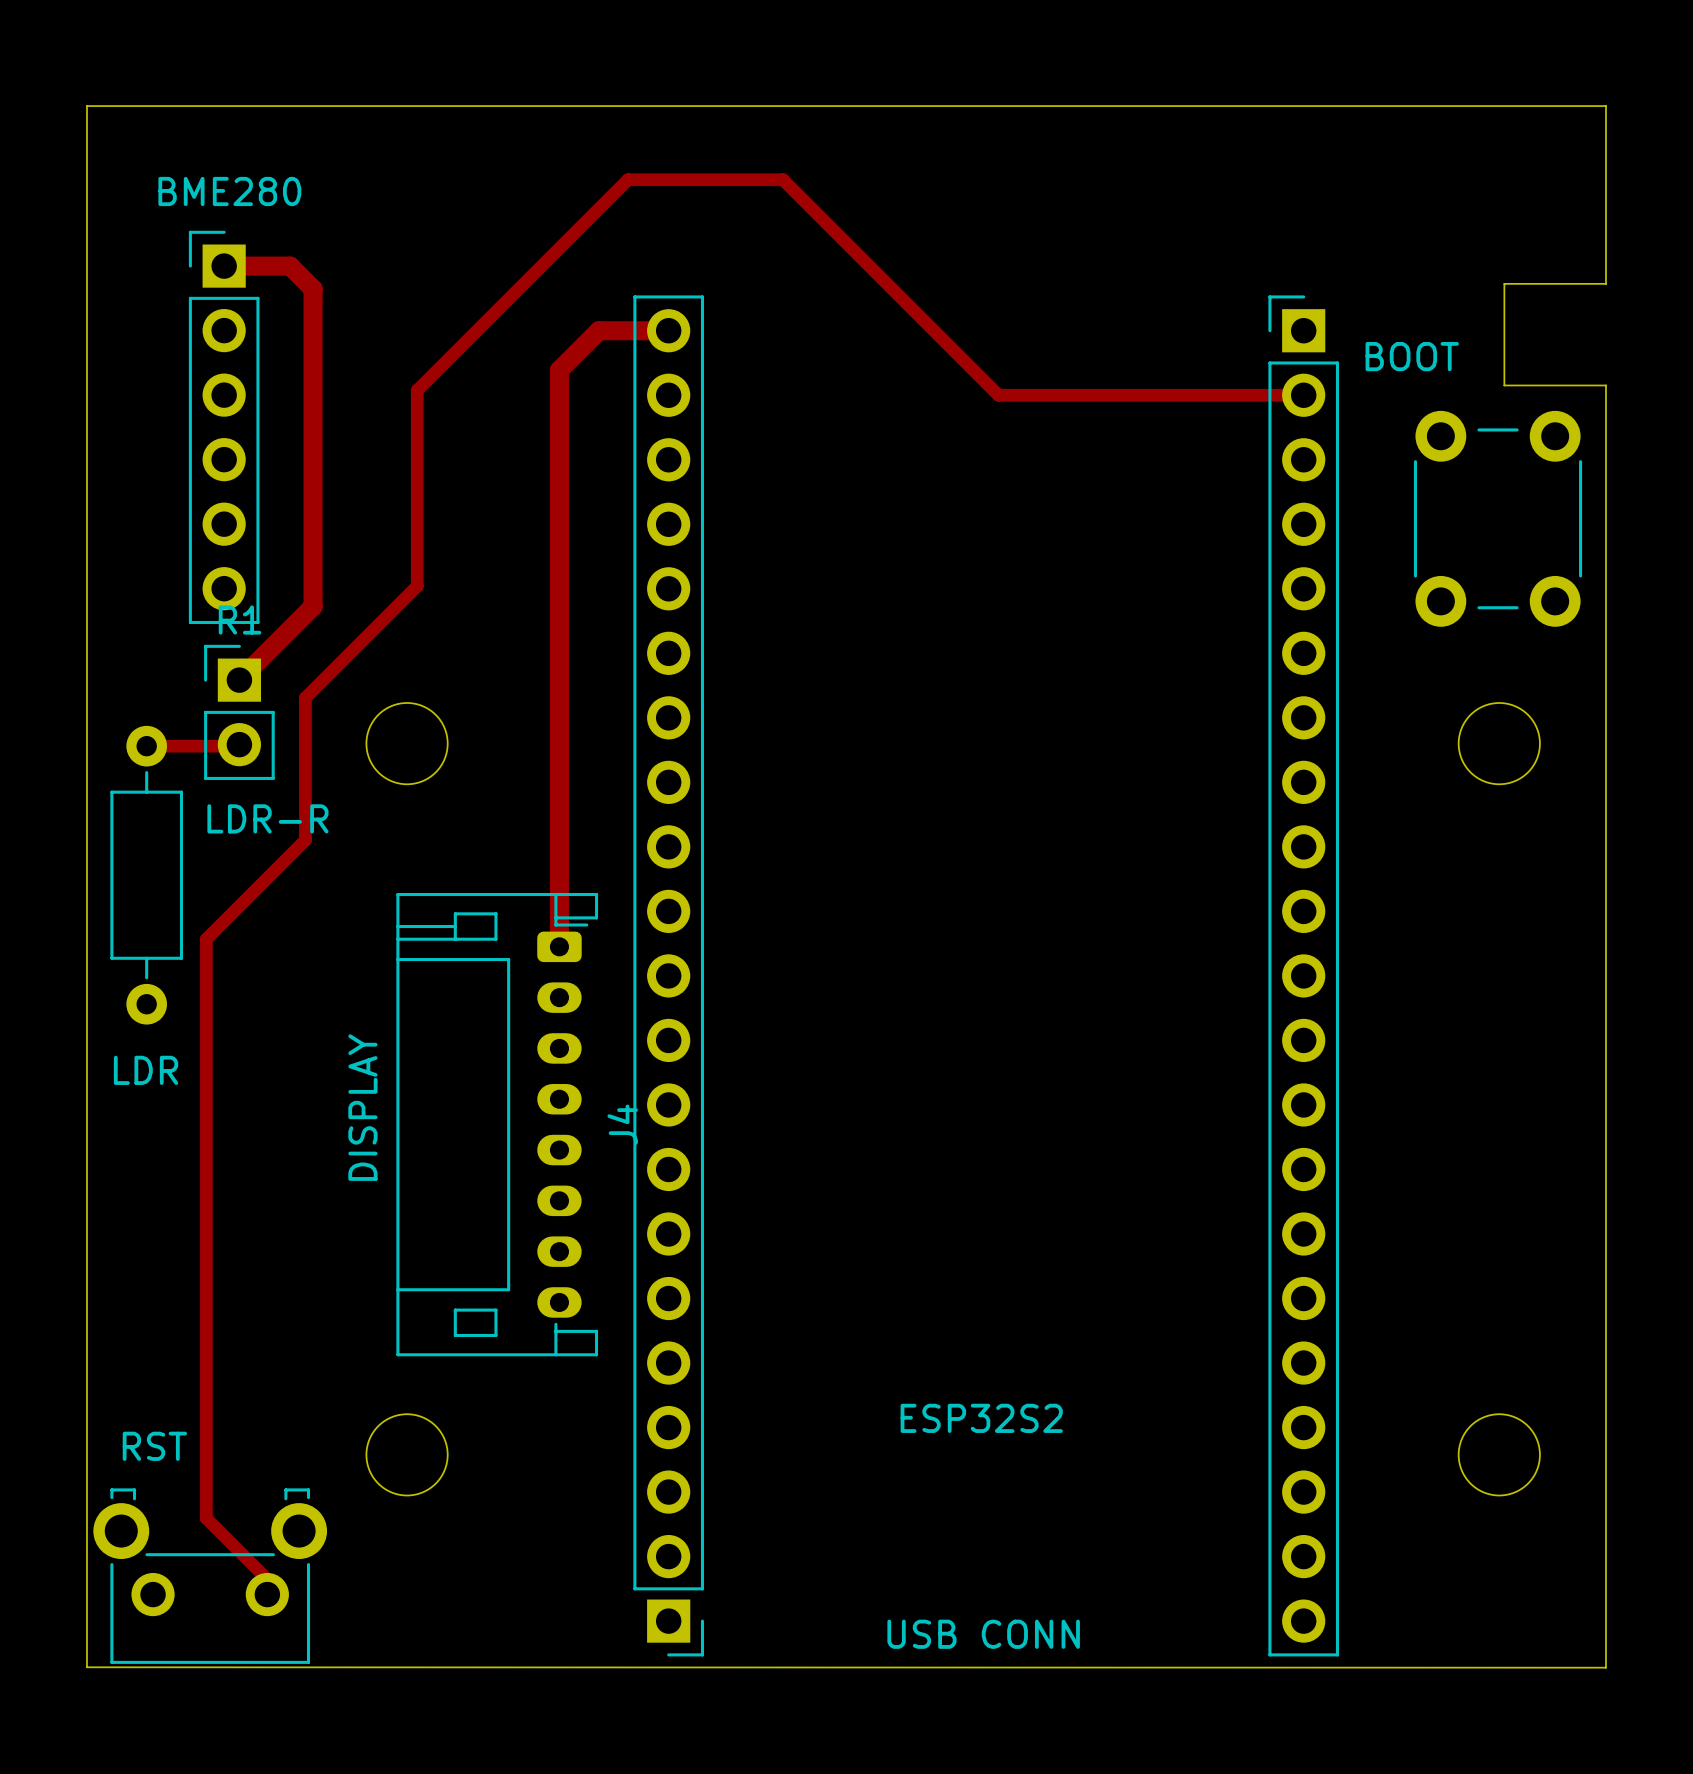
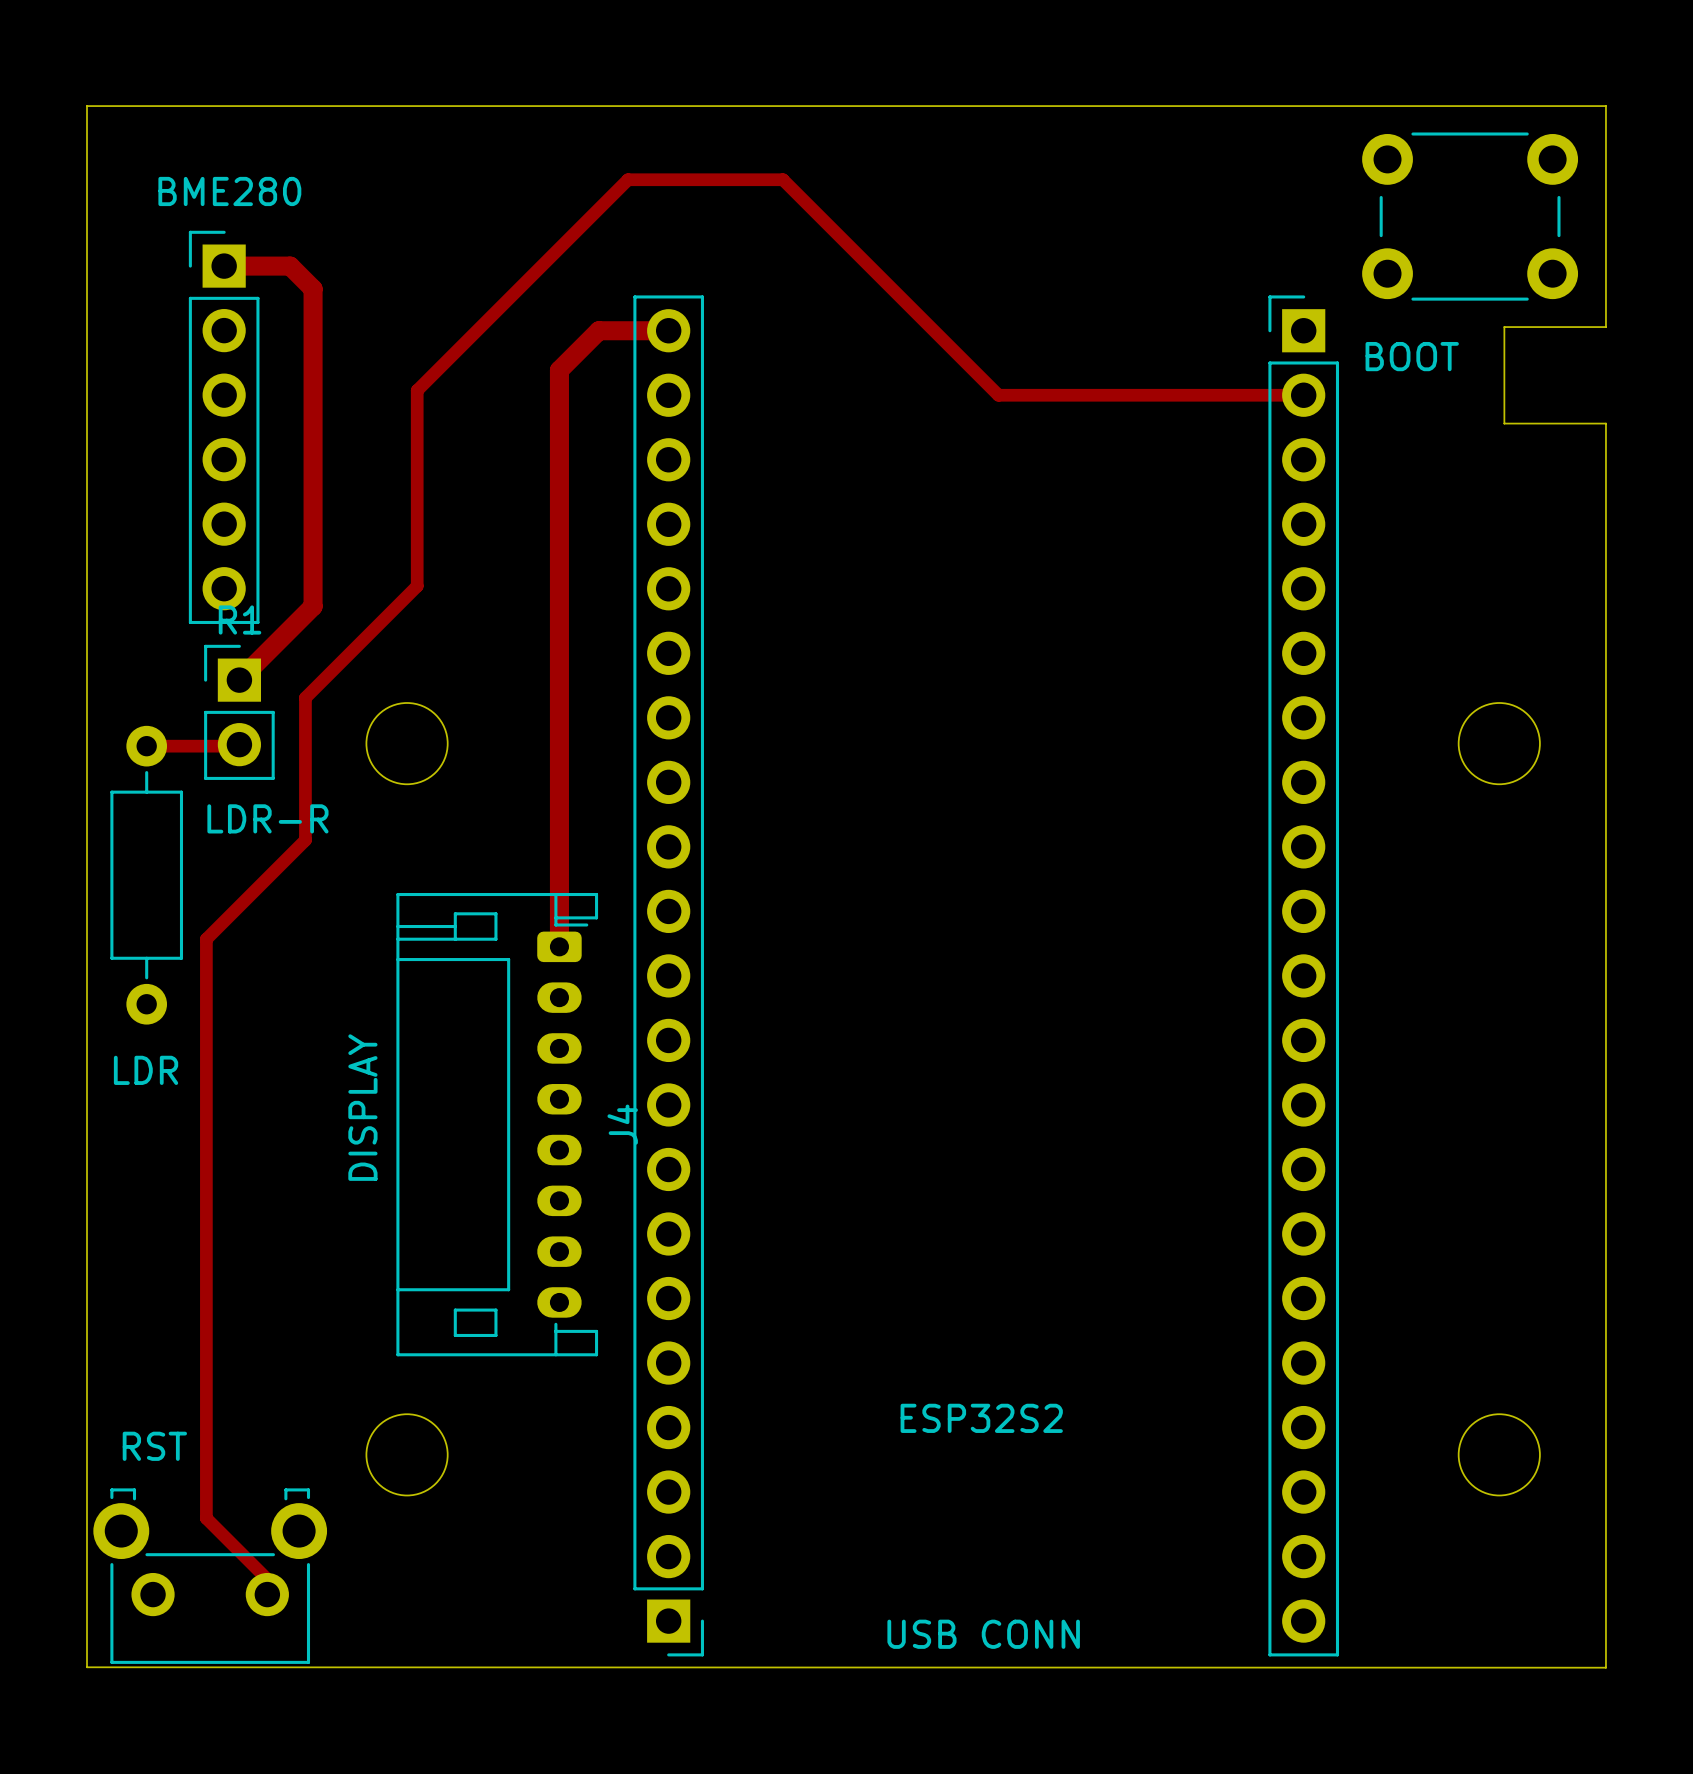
board edge: (1605, 283) (1504, 283) (1504, 327) -> (1605, 283) (1605, 327) (1504, 327)
board edge: (1504, 385) (1605, 385) (1605, 423) -> (1504, 385) (1504, 423) (1605, 423)
part rotation: 0° (1498, 518) -> 90° clockwise (1470, 216)
part position: (1498, 518) -> (1470, 216)

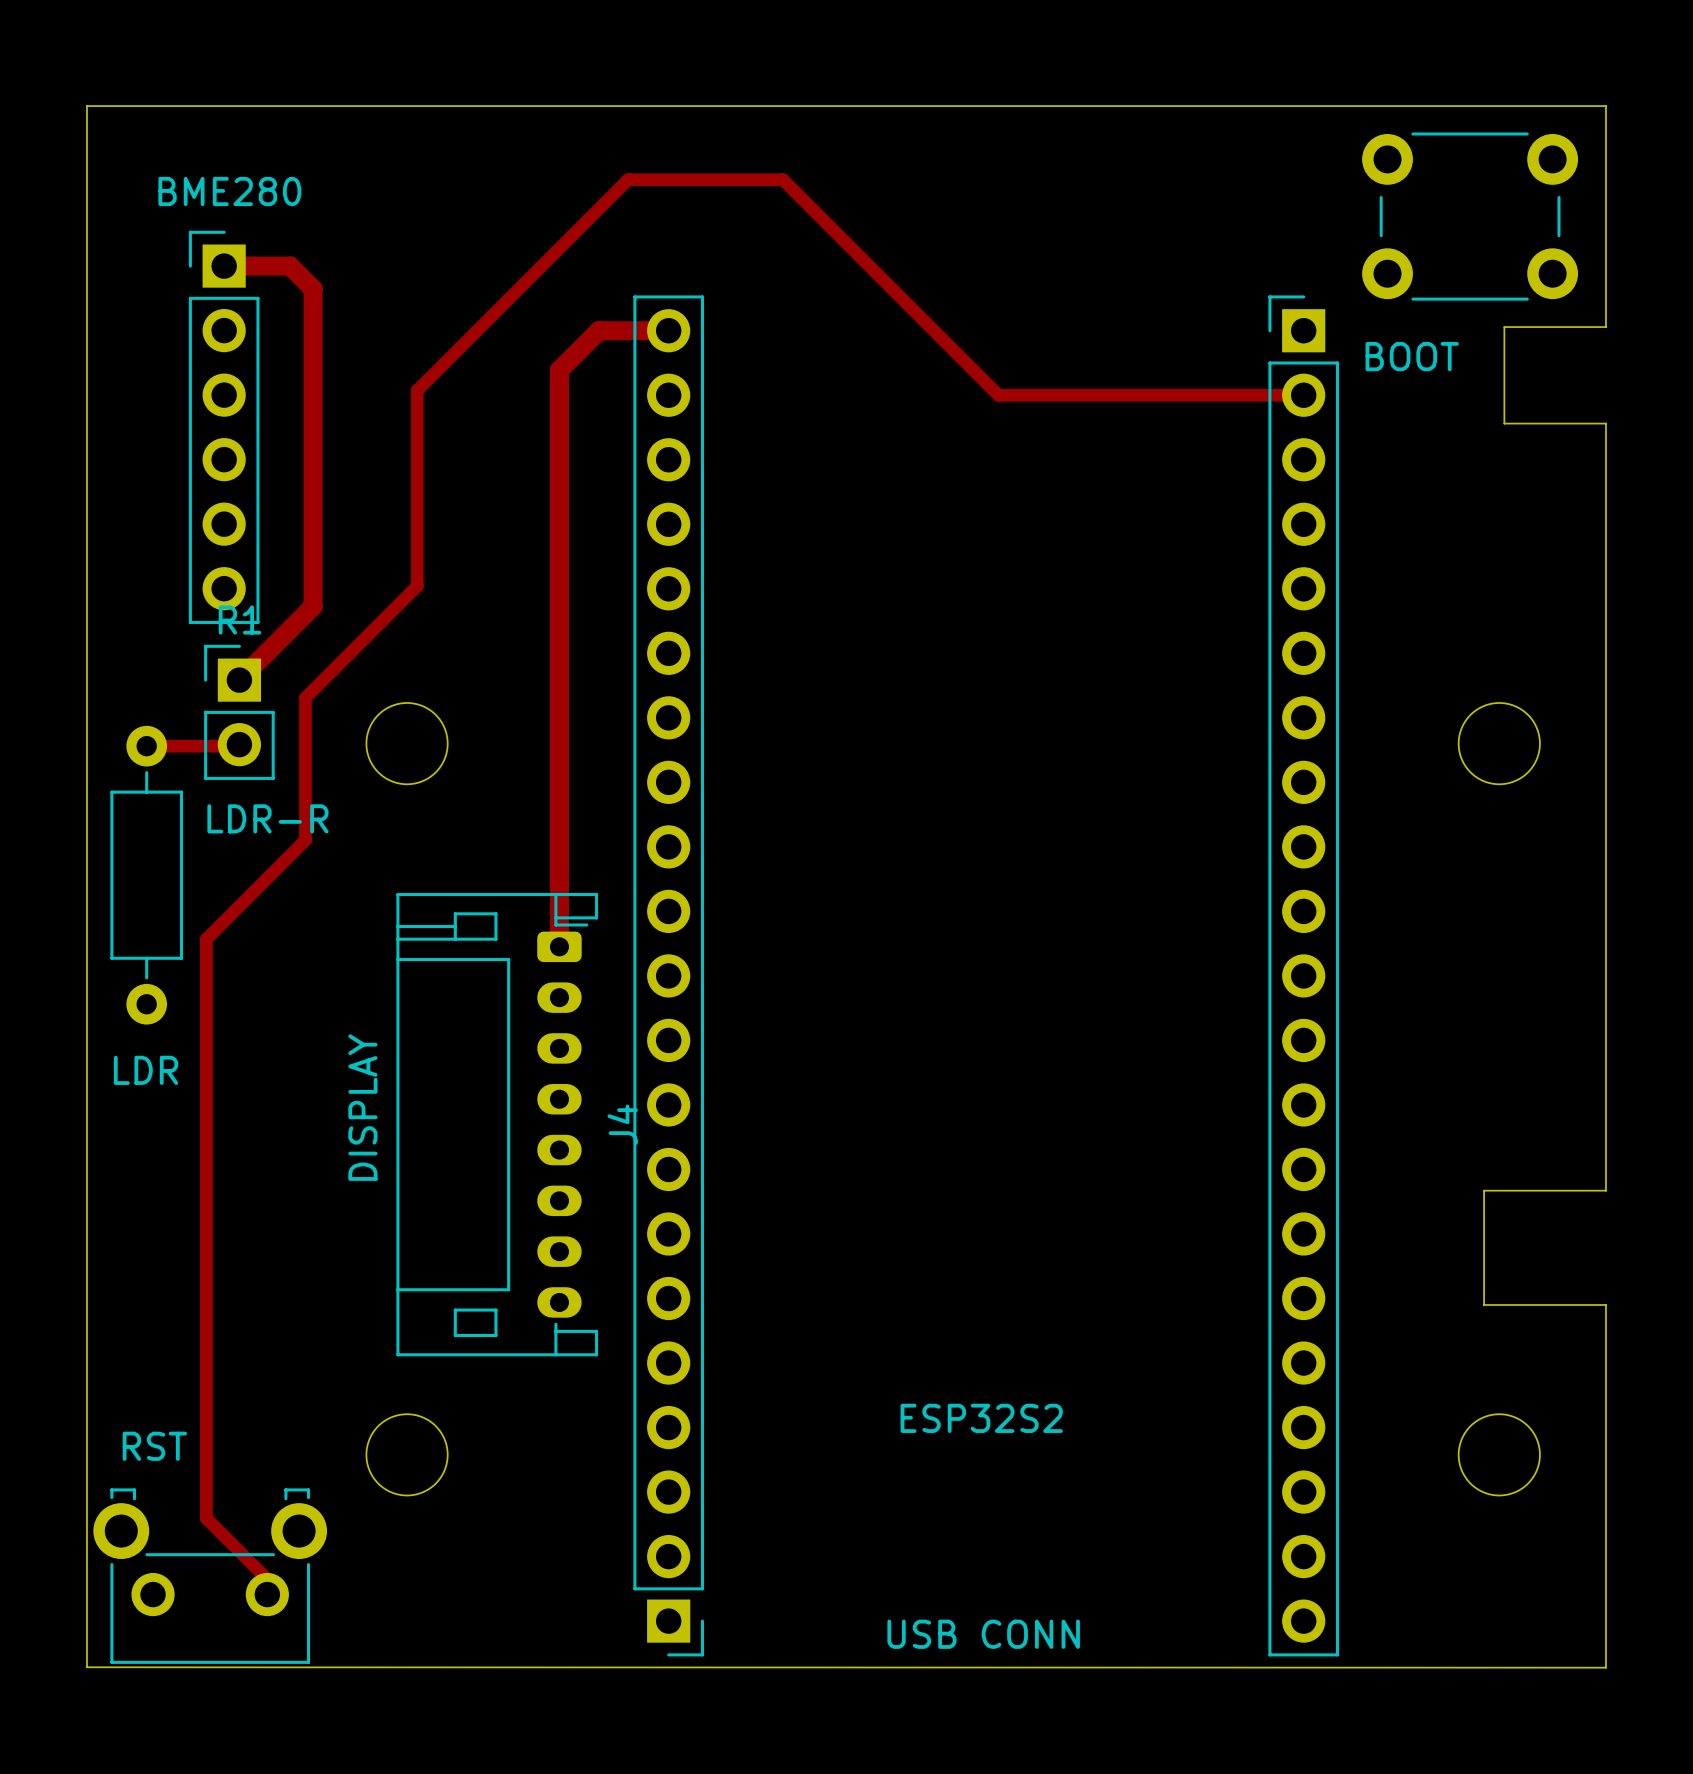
board edge: (1605, 1190) (1605, 1304) -> (1605, 1190) (1484, 1190) (1484, 1304) (1605, 1304)

